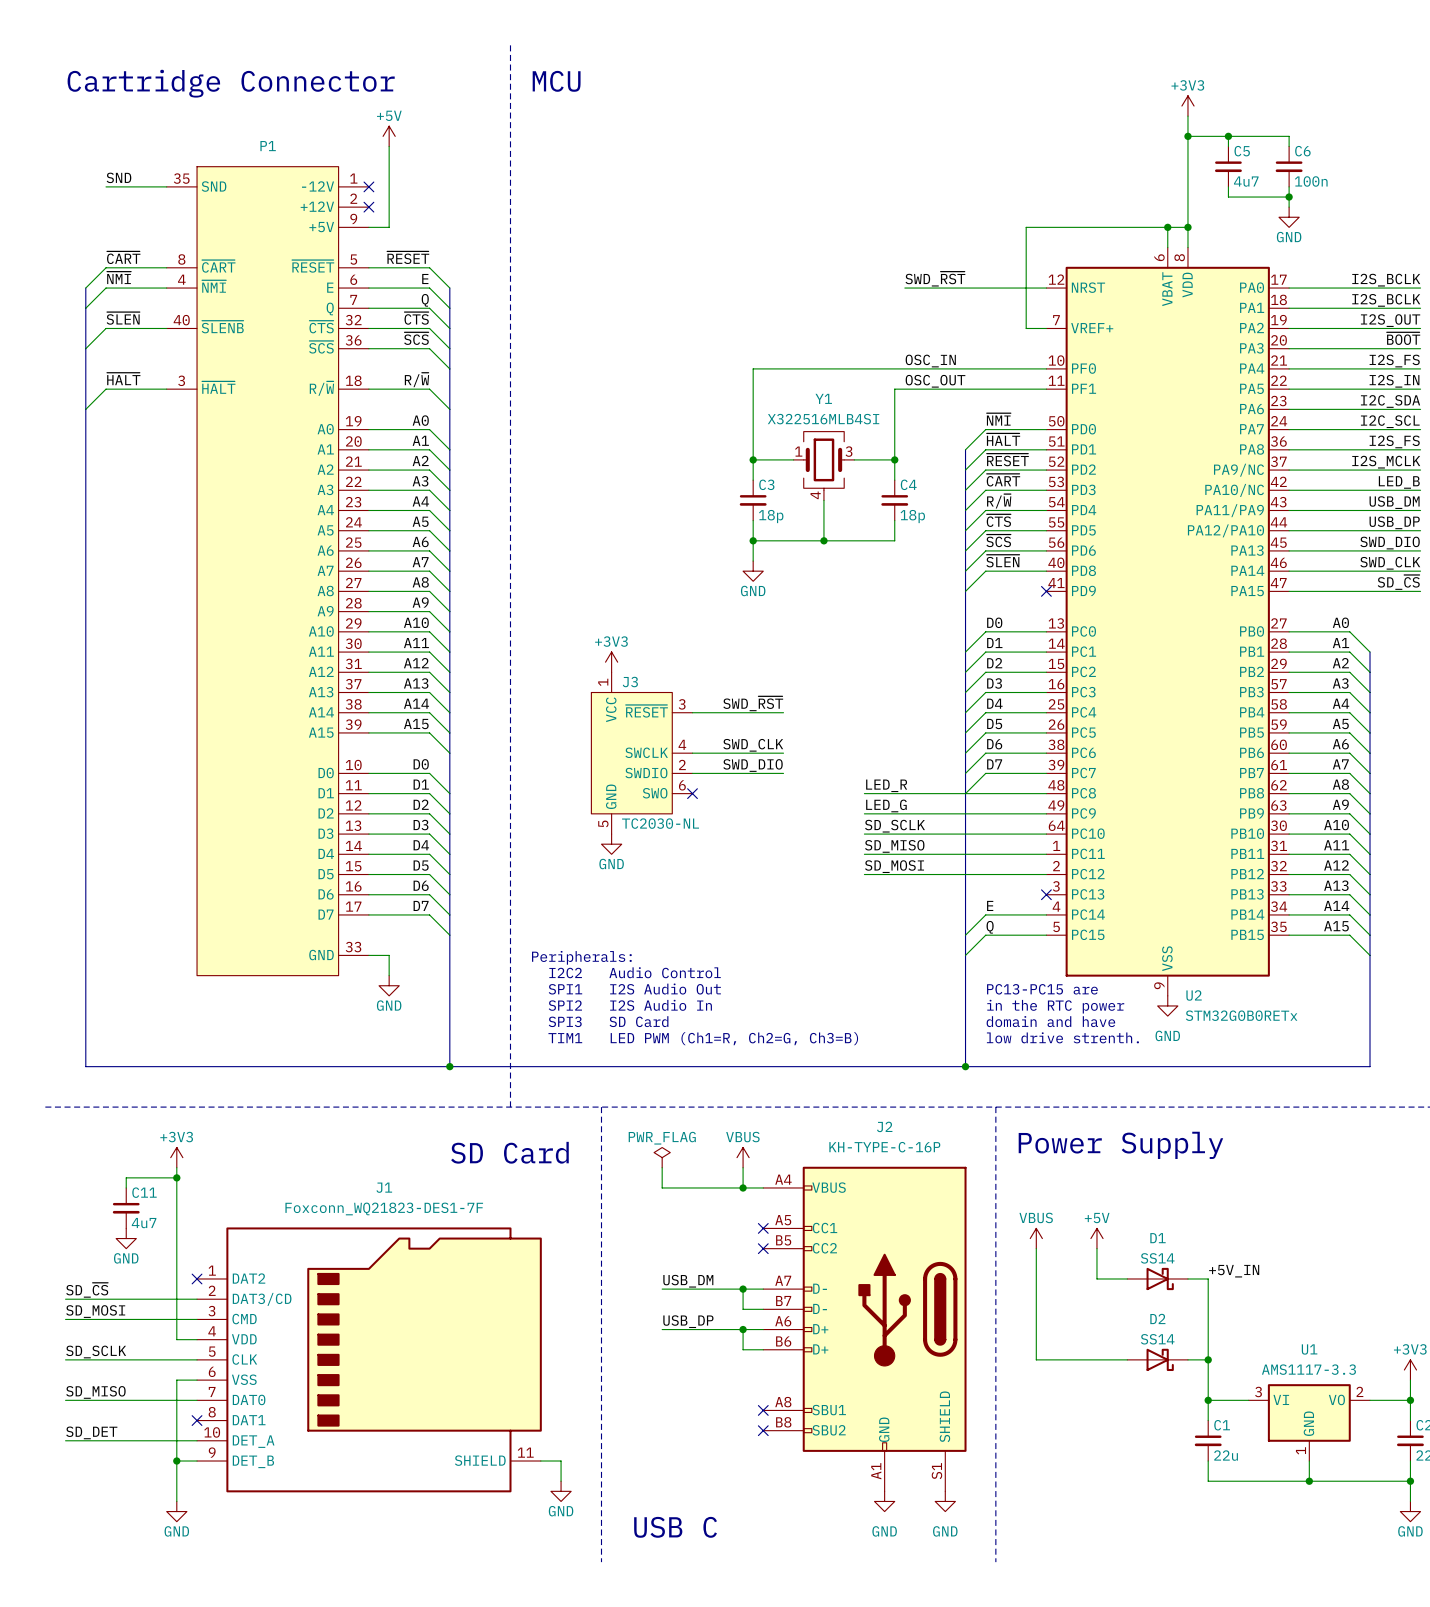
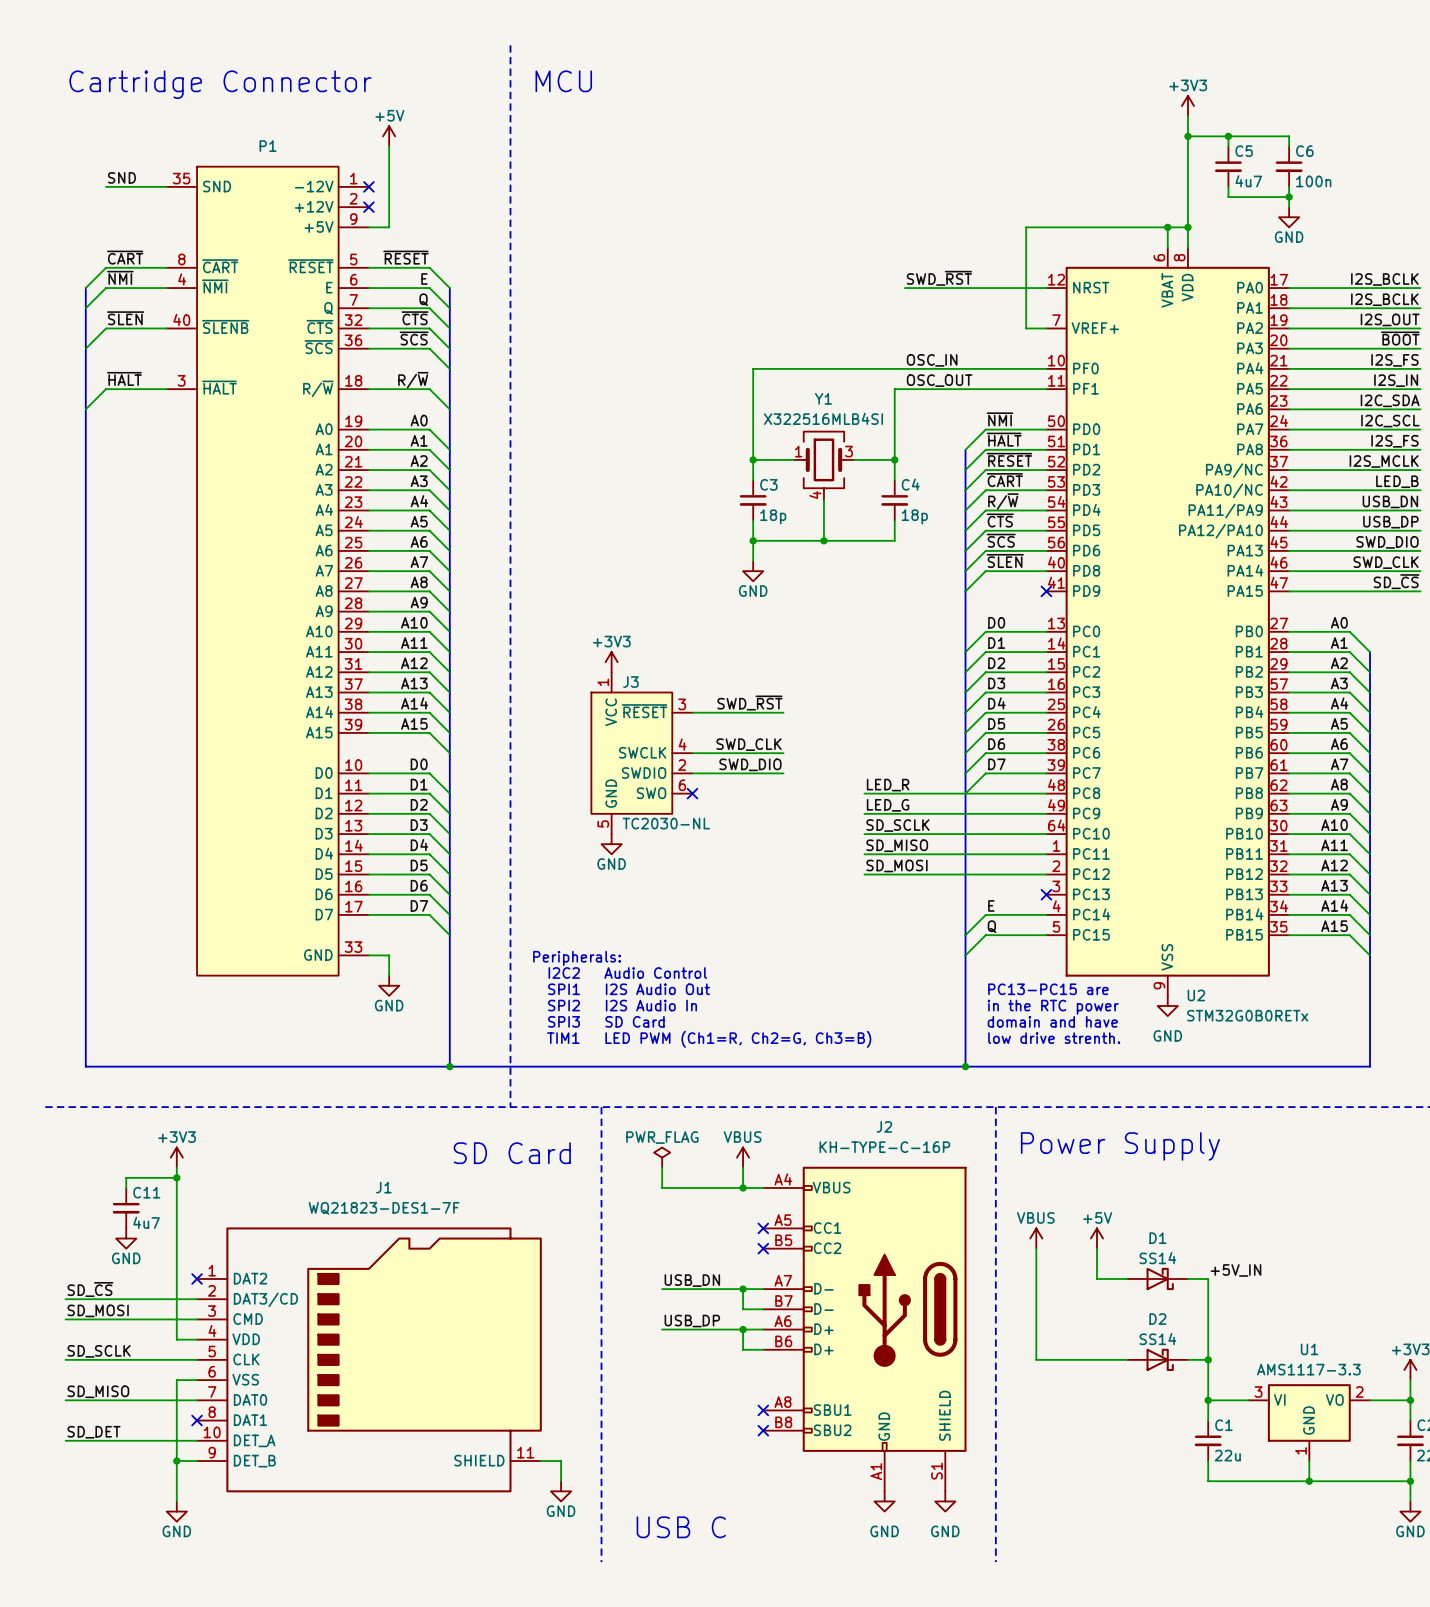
label: USB_DM (1394, 502) -> USB_DN (1390, 501)
J1 value: Foxconn_WQ21823-DES1-7F (384, 1208) -> WQ21823-DES1-7F (384, 1208)
label: USB_DM (688, 1281) -> USB_DN (692, 1280)

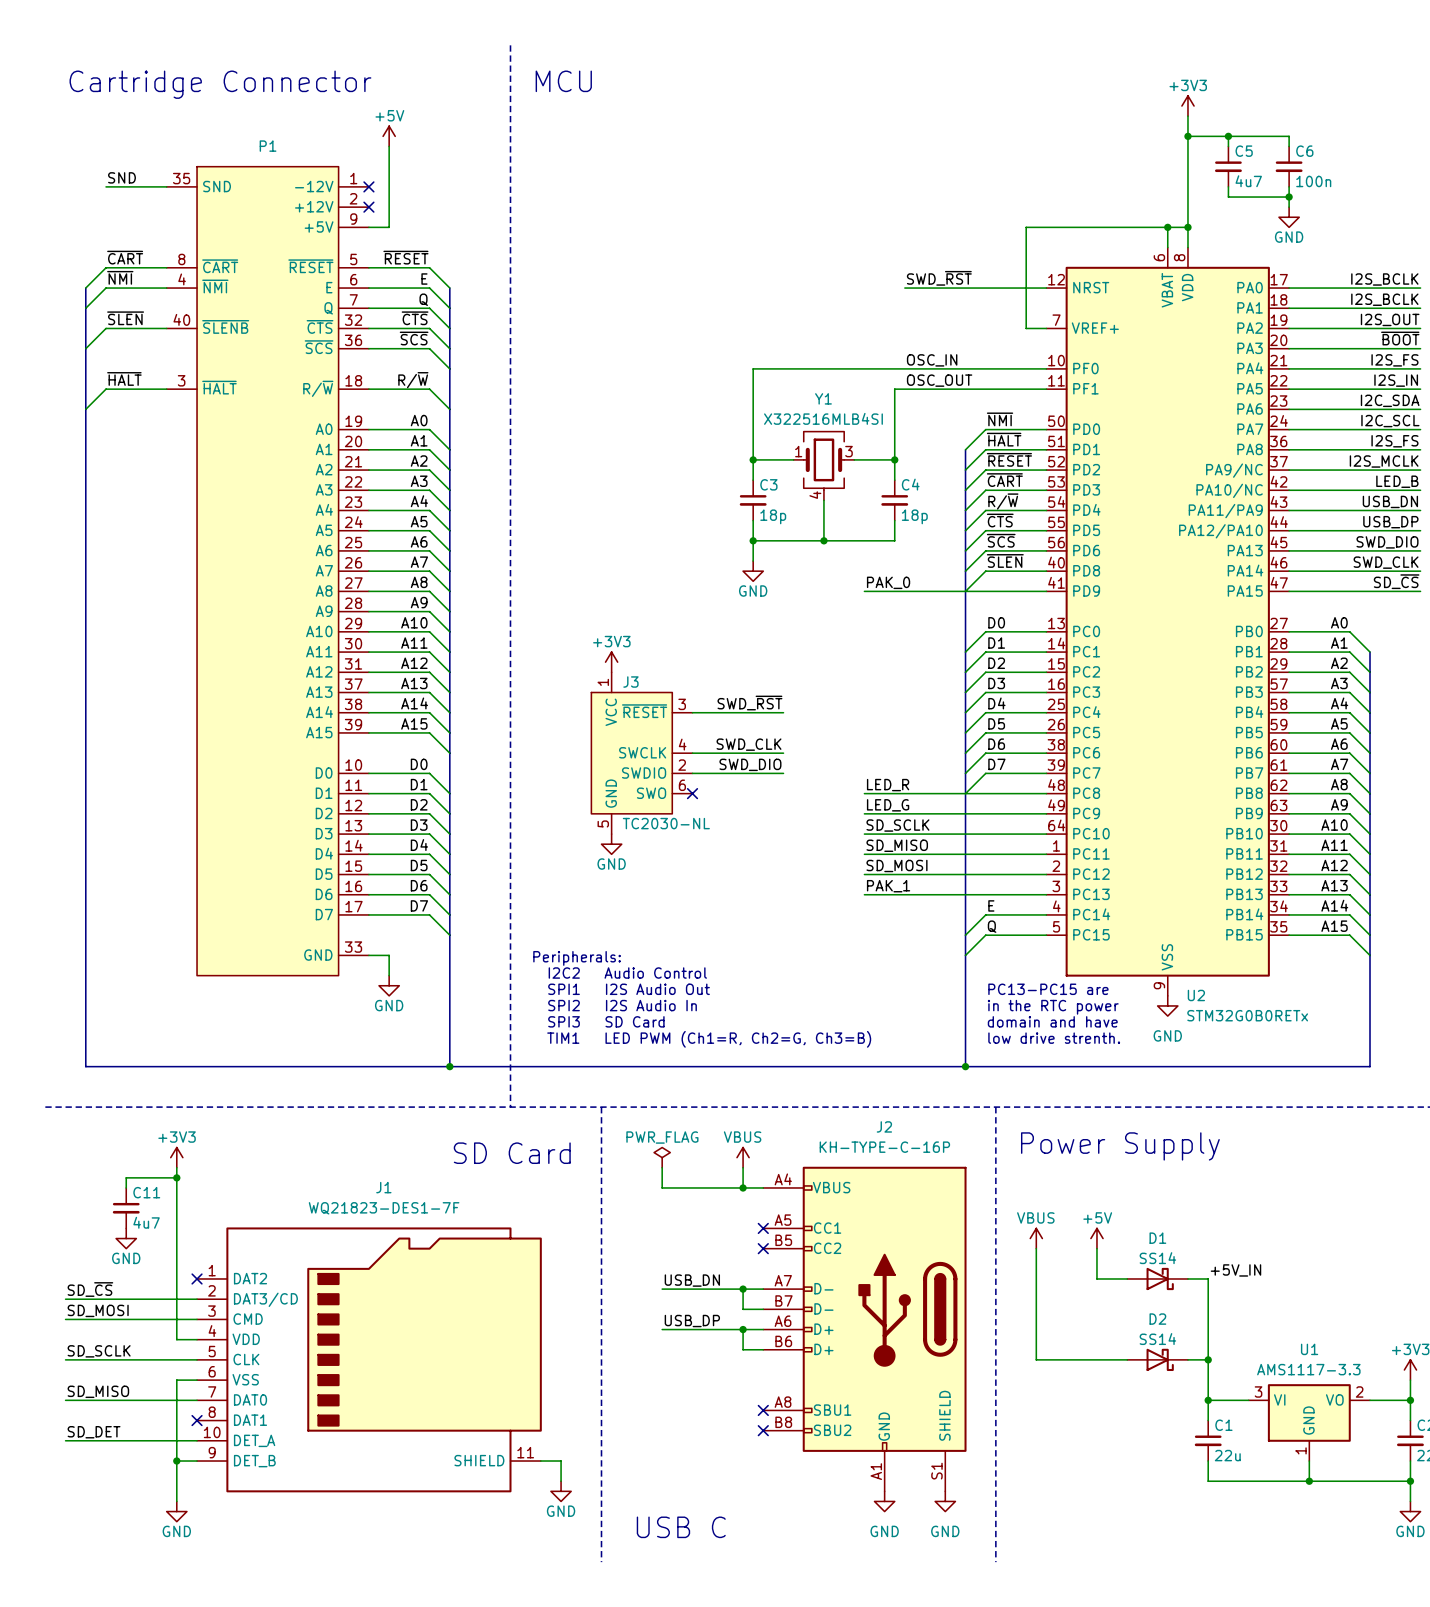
label: none -> PAK_0 (888, 582)
wire: none -> (864, 591) (1046, 591)
no-connect mark: (1046, 591) -> none
label: none -> PAK_1 (888, 886)
wire: none -> (864, 894) (1046, 894)
no-connect mark: (1046, 894) -> none

